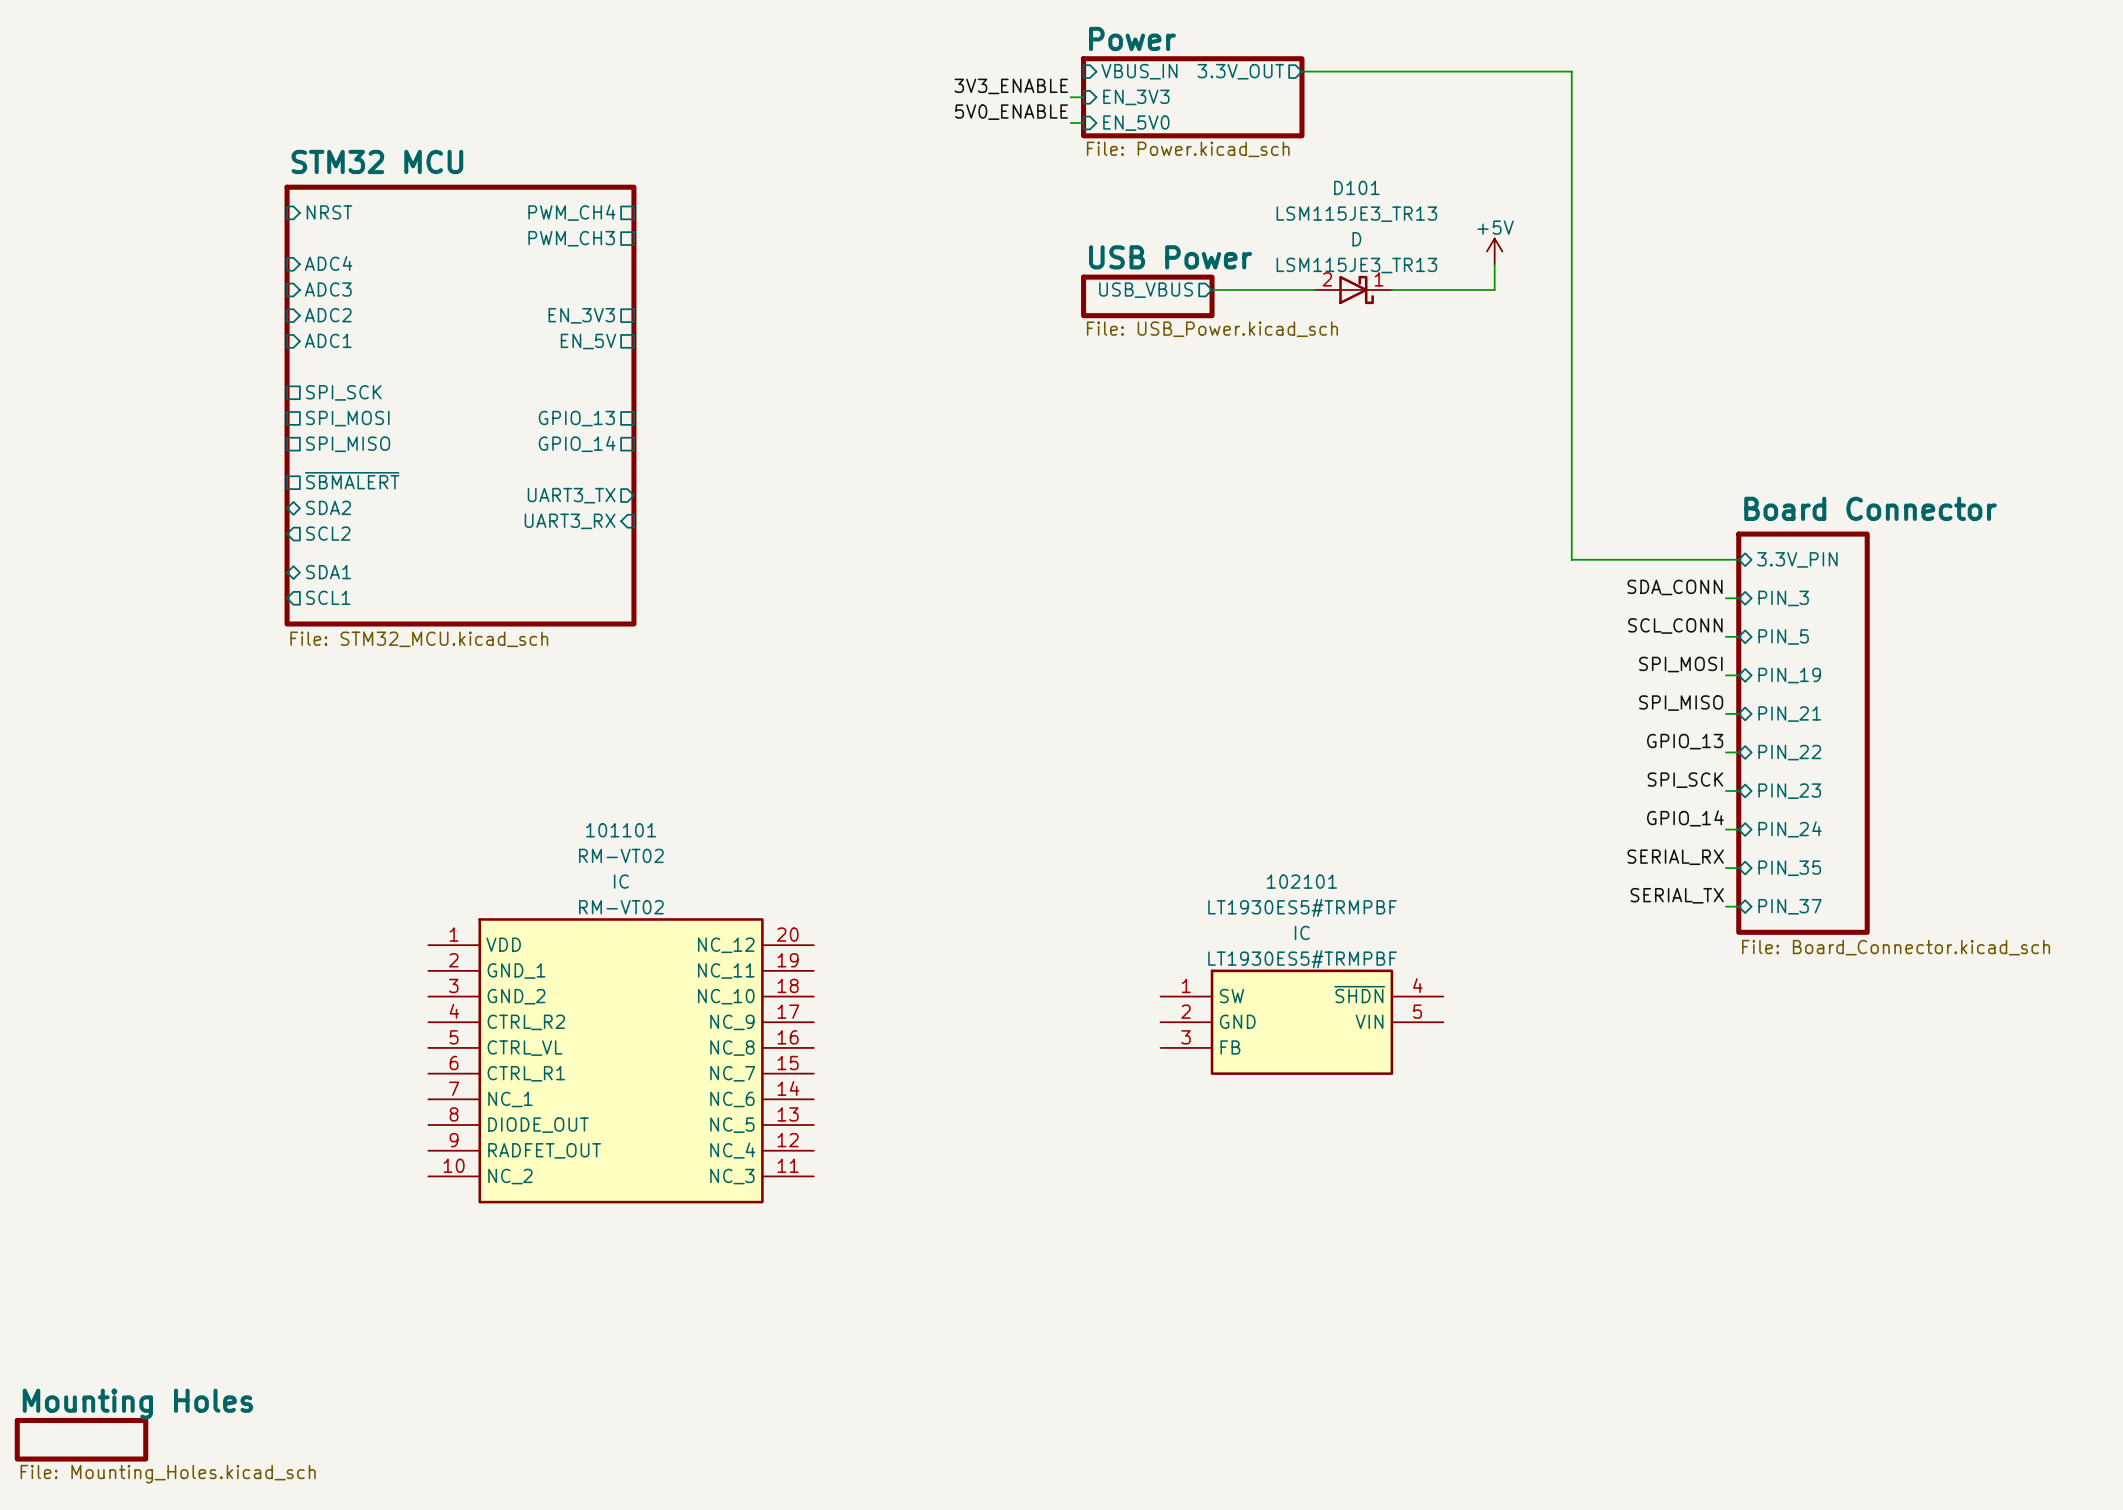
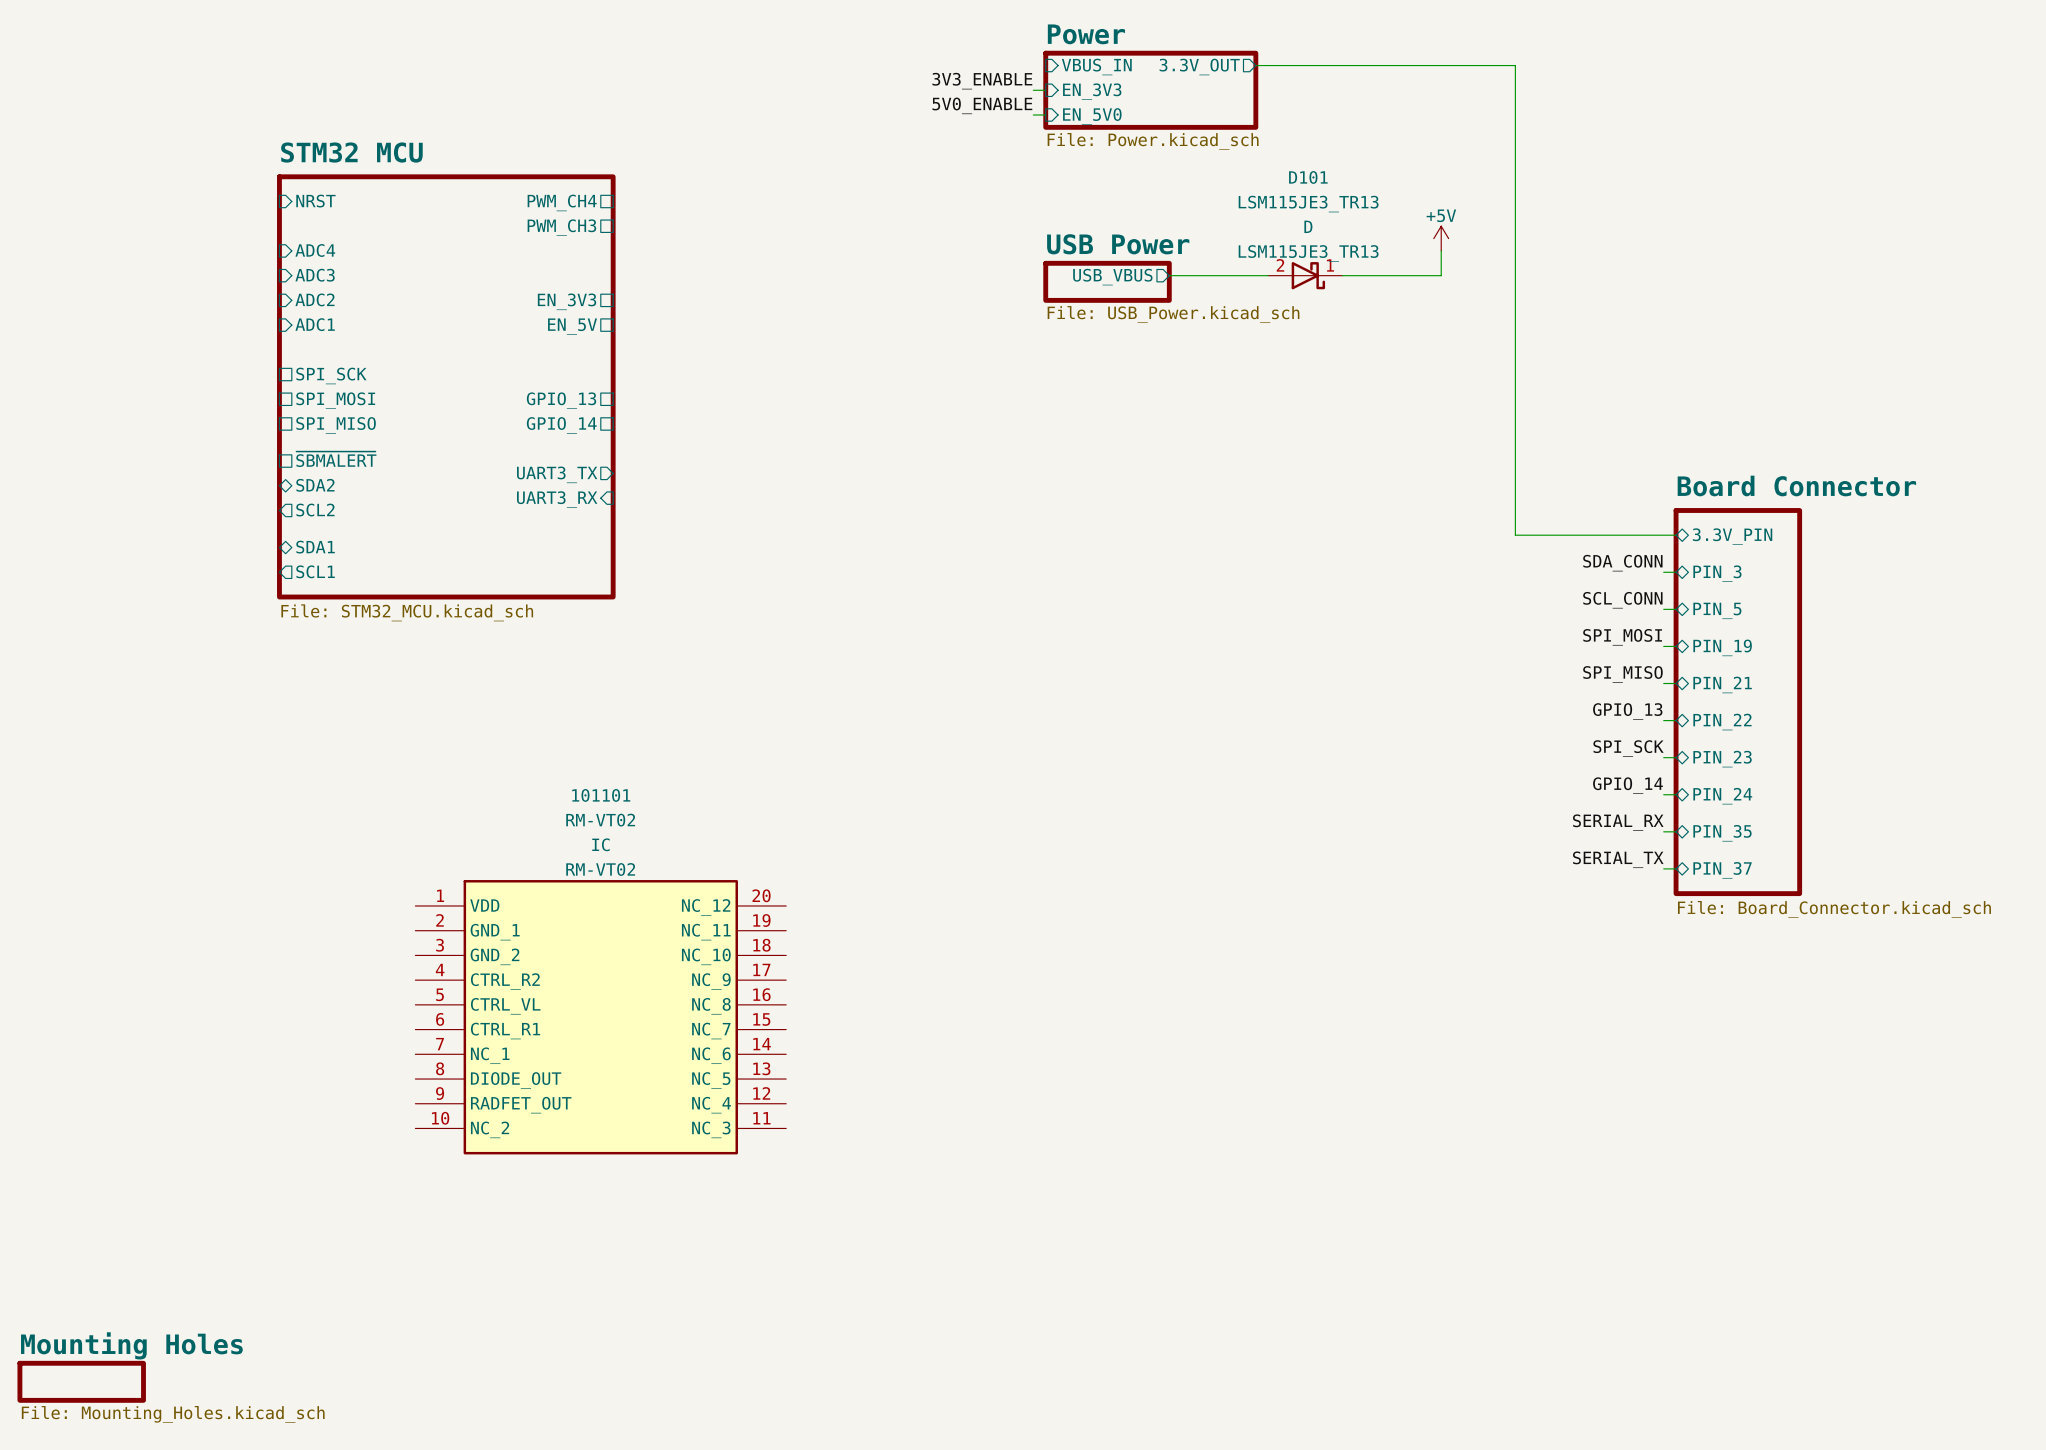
102101: LT1930ES5#TRMPBF (1301, 1022) -> none

